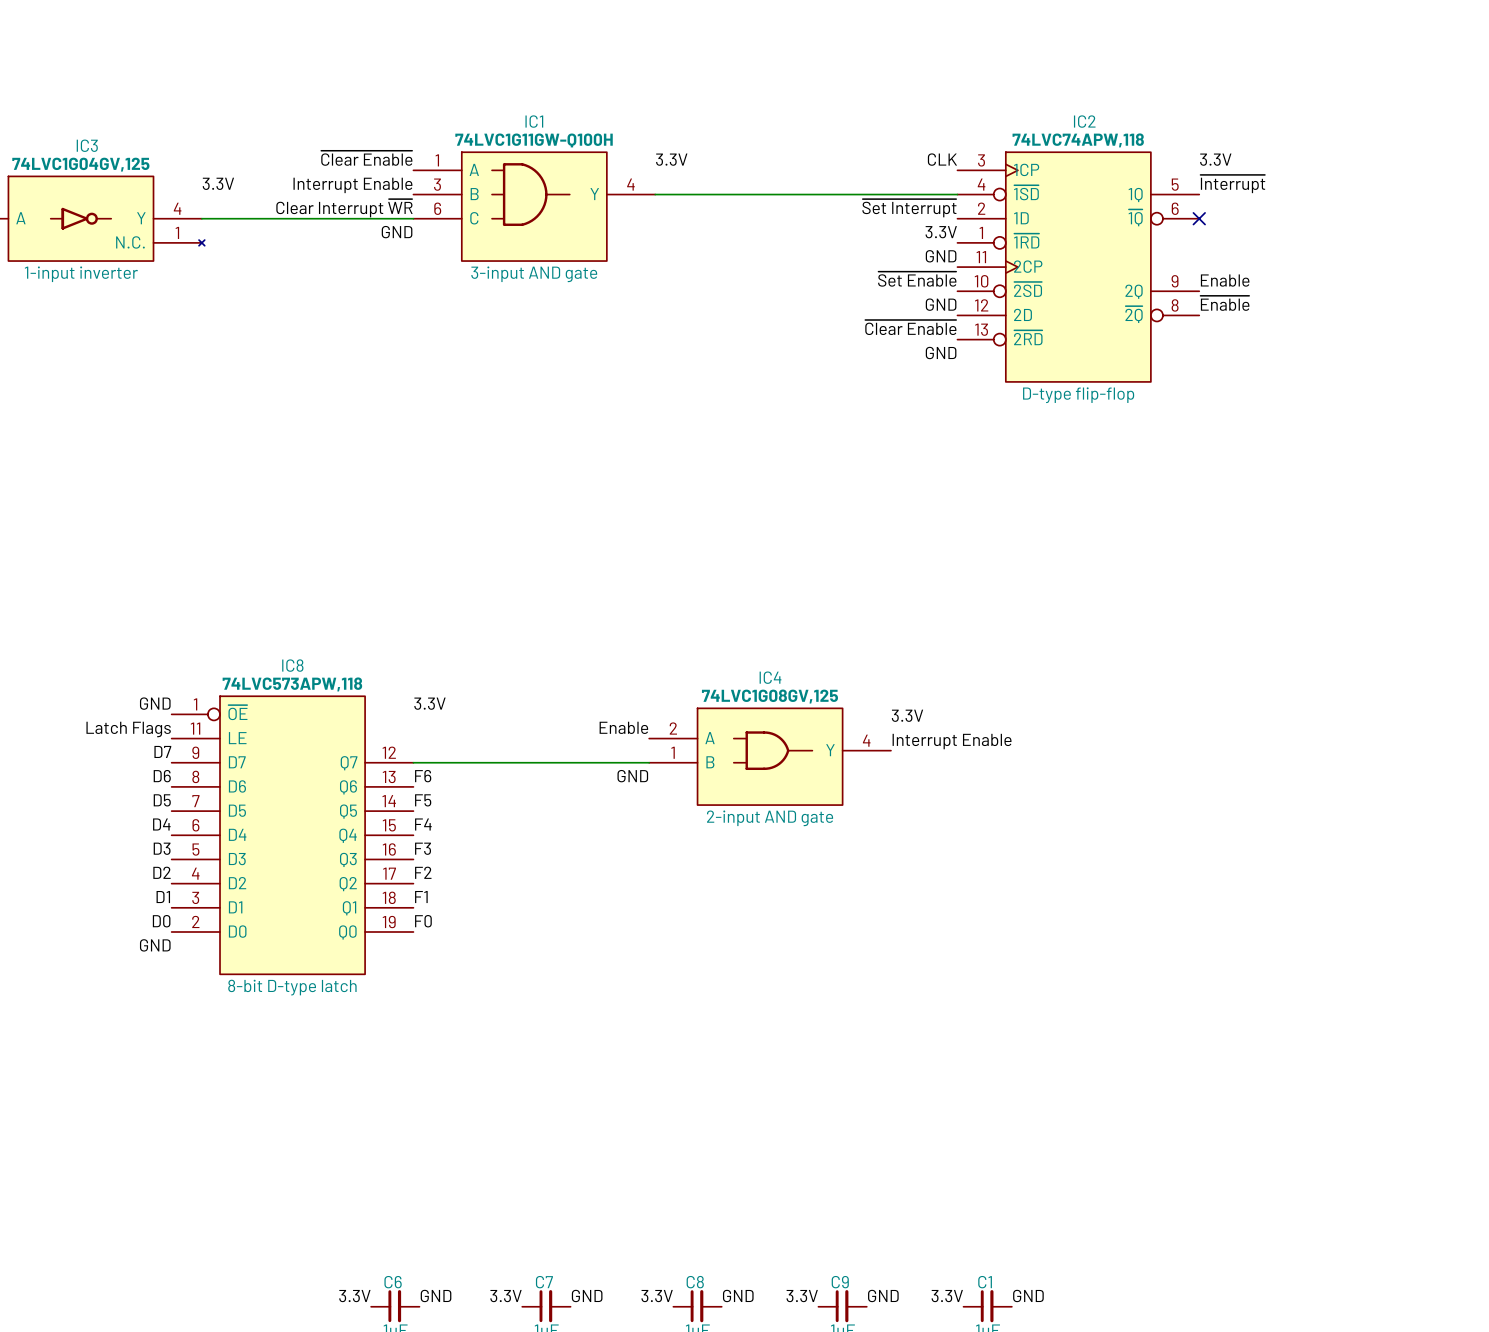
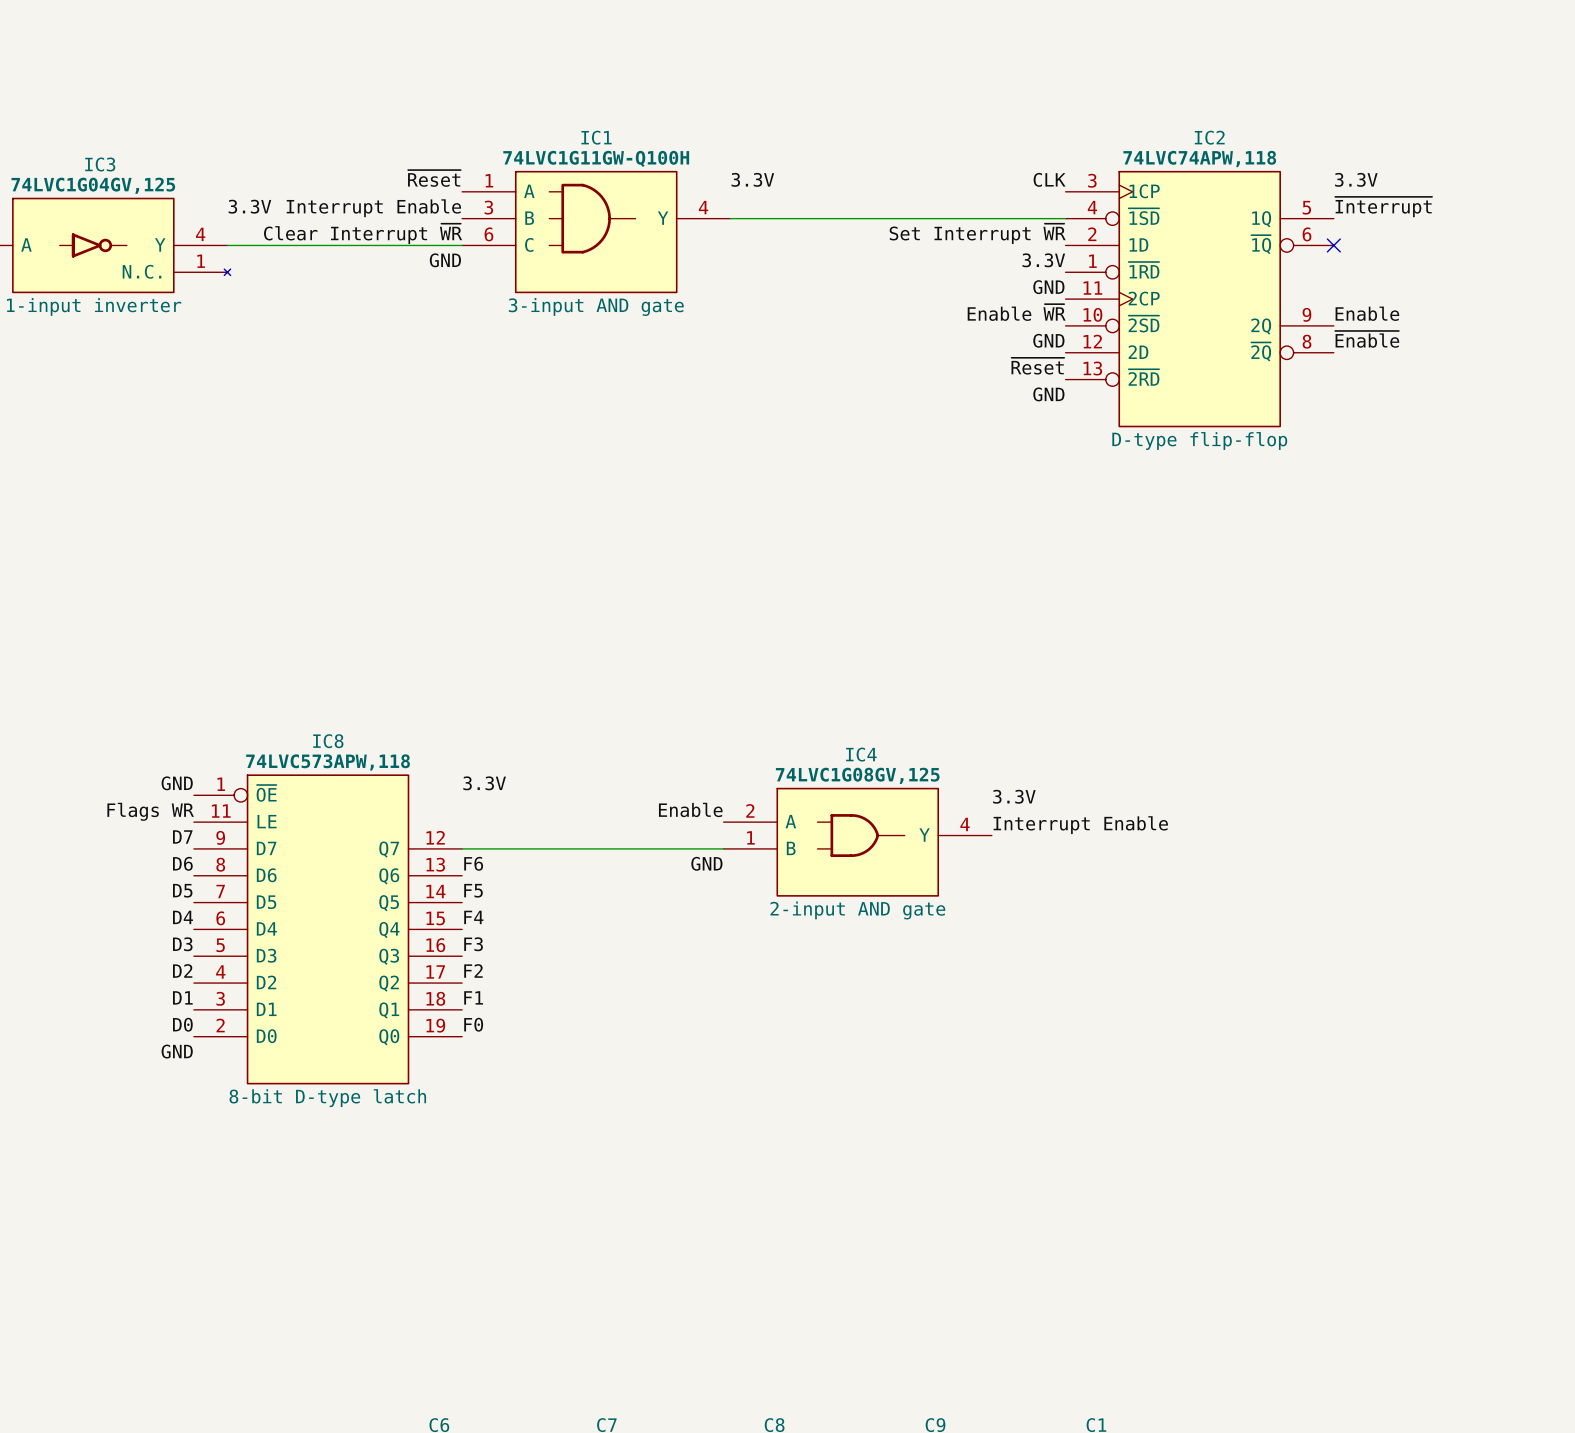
label: ~{Clear Enable} (366, 158) -> ~{Reset} (434, 178)
label: ~{Set Interrupt} (909, 208) -> Set Interrupt ~{WR} (977, 233)
label: ~{Set Enable} (917, 279) -> Enable ~{WR} (1016, 312)
label: ~{Clear Enable} (910, 327) -> ~{Reset} (1037, 366)
label: Latch Flags (128, 729) -> Flags WR (150, 811)

